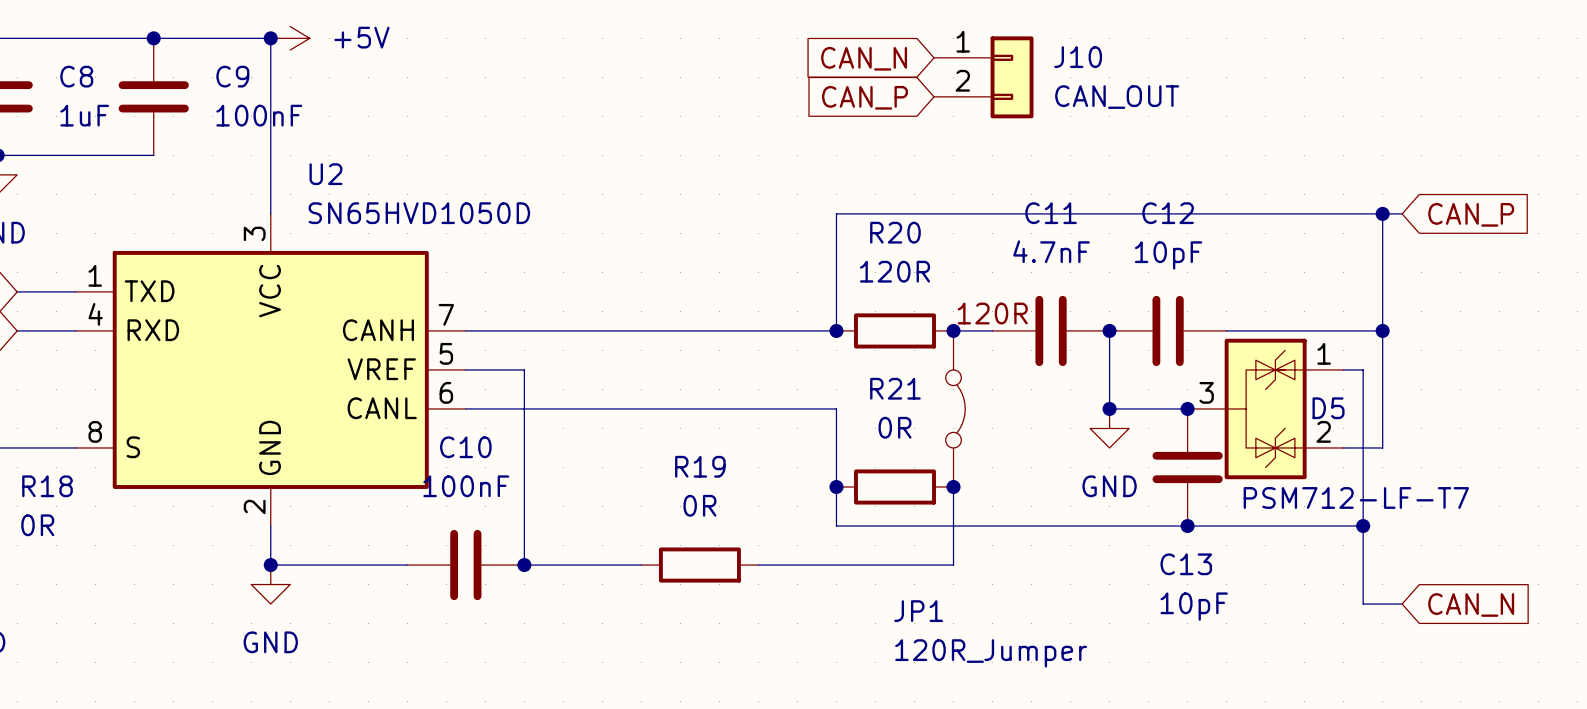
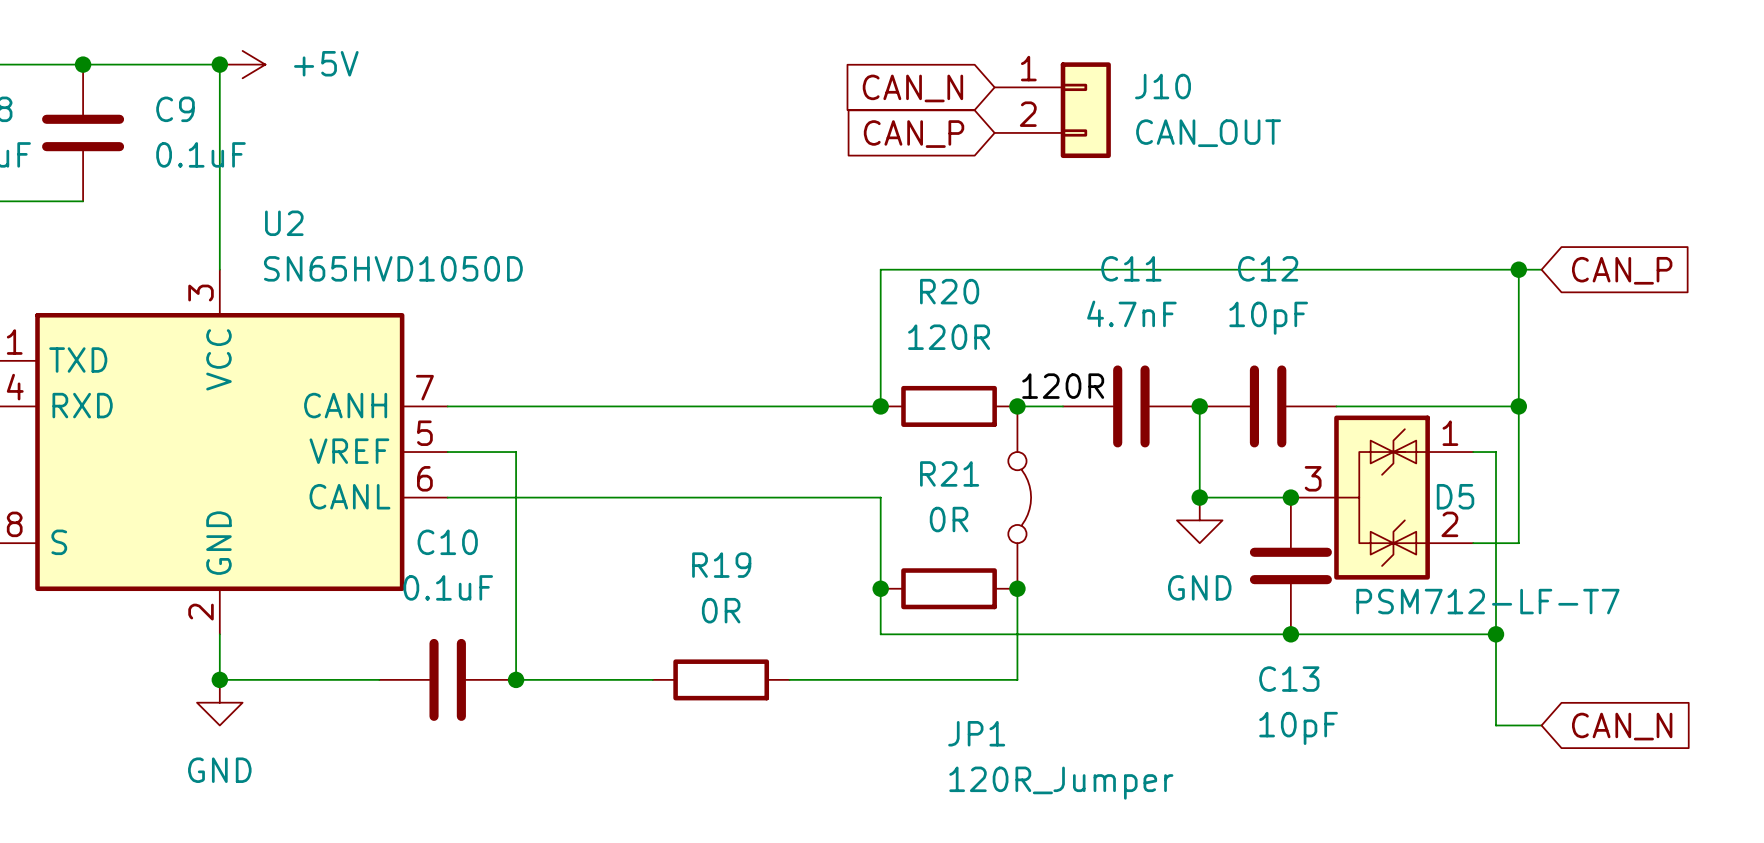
C9 value: 100nF (259, 115) -> 0.1uF (200, 154)
C10 value: 100nF (466, 486) -> 0.1uF (448, 587)

